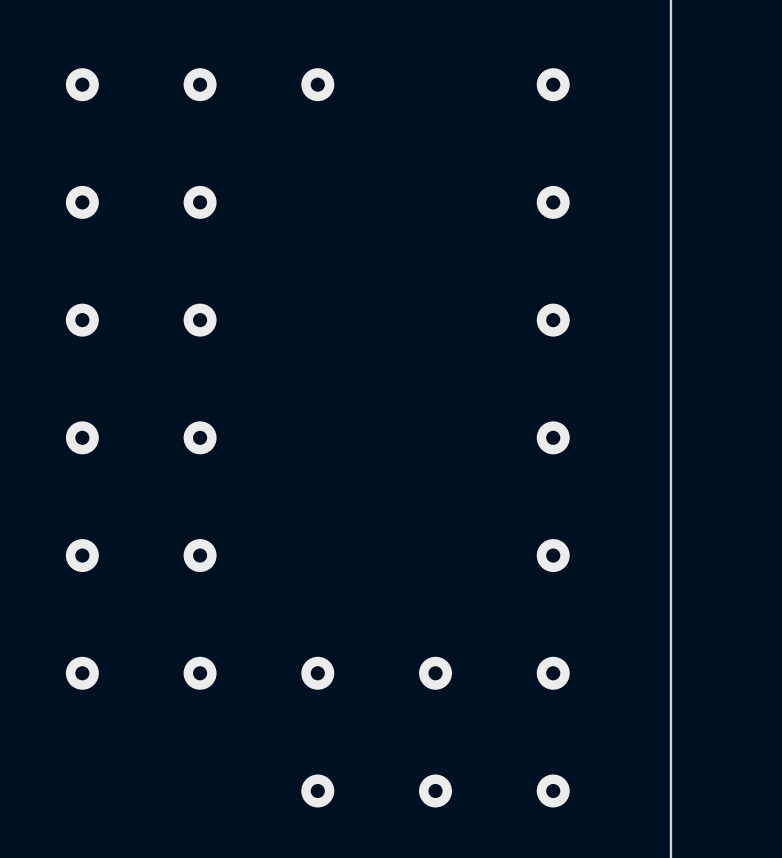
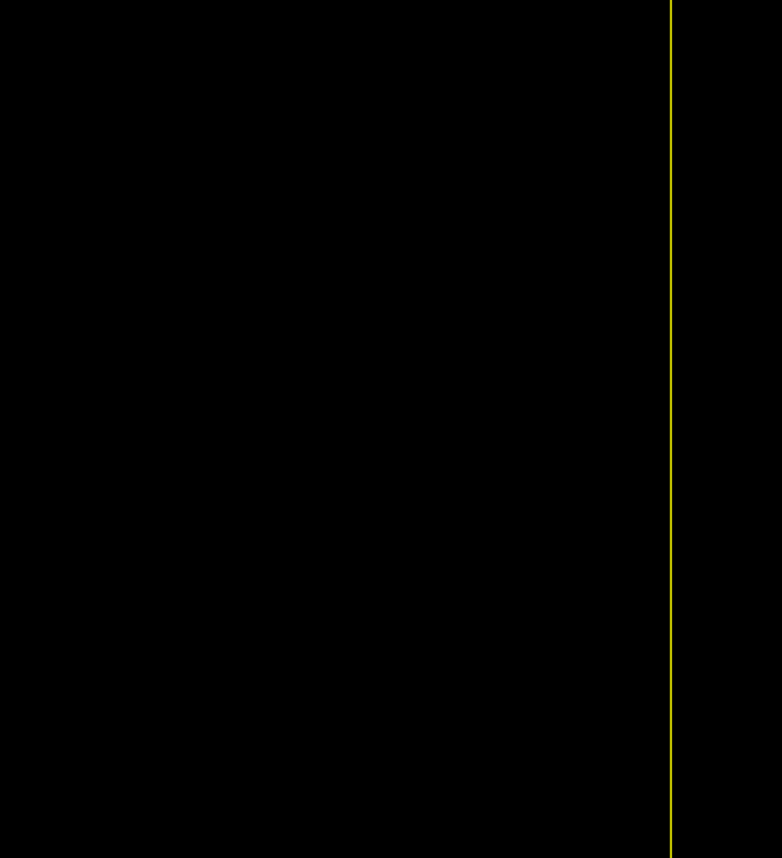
via: (82, 84) -> none
via: (200, 84) -> none
via: (317, 84) -> none
via: (553, 84) -> none
via: (82, 202) -> none
via: (200, 202) -> none
via: (553, 202) -> none
via: (82, 320) -> none
via: (200, 320) -> none
via: (553, 320) -> none
via: (82, 437) -> none
via: (200, 437) -> none
via: (553, 437) -> none
via: (82, 555) -> none
via: (200, 555) -> none
via: (553, 555) -> none
via: (82, 673) -> none
via: (200, 673) -> none
via: (317, 673) -> none
via: (435, 673) -> none
via: (553, 673) -> none
via: (317, 790) -> none
via: (435, 790) -> none
via: (553, 790) -> none

